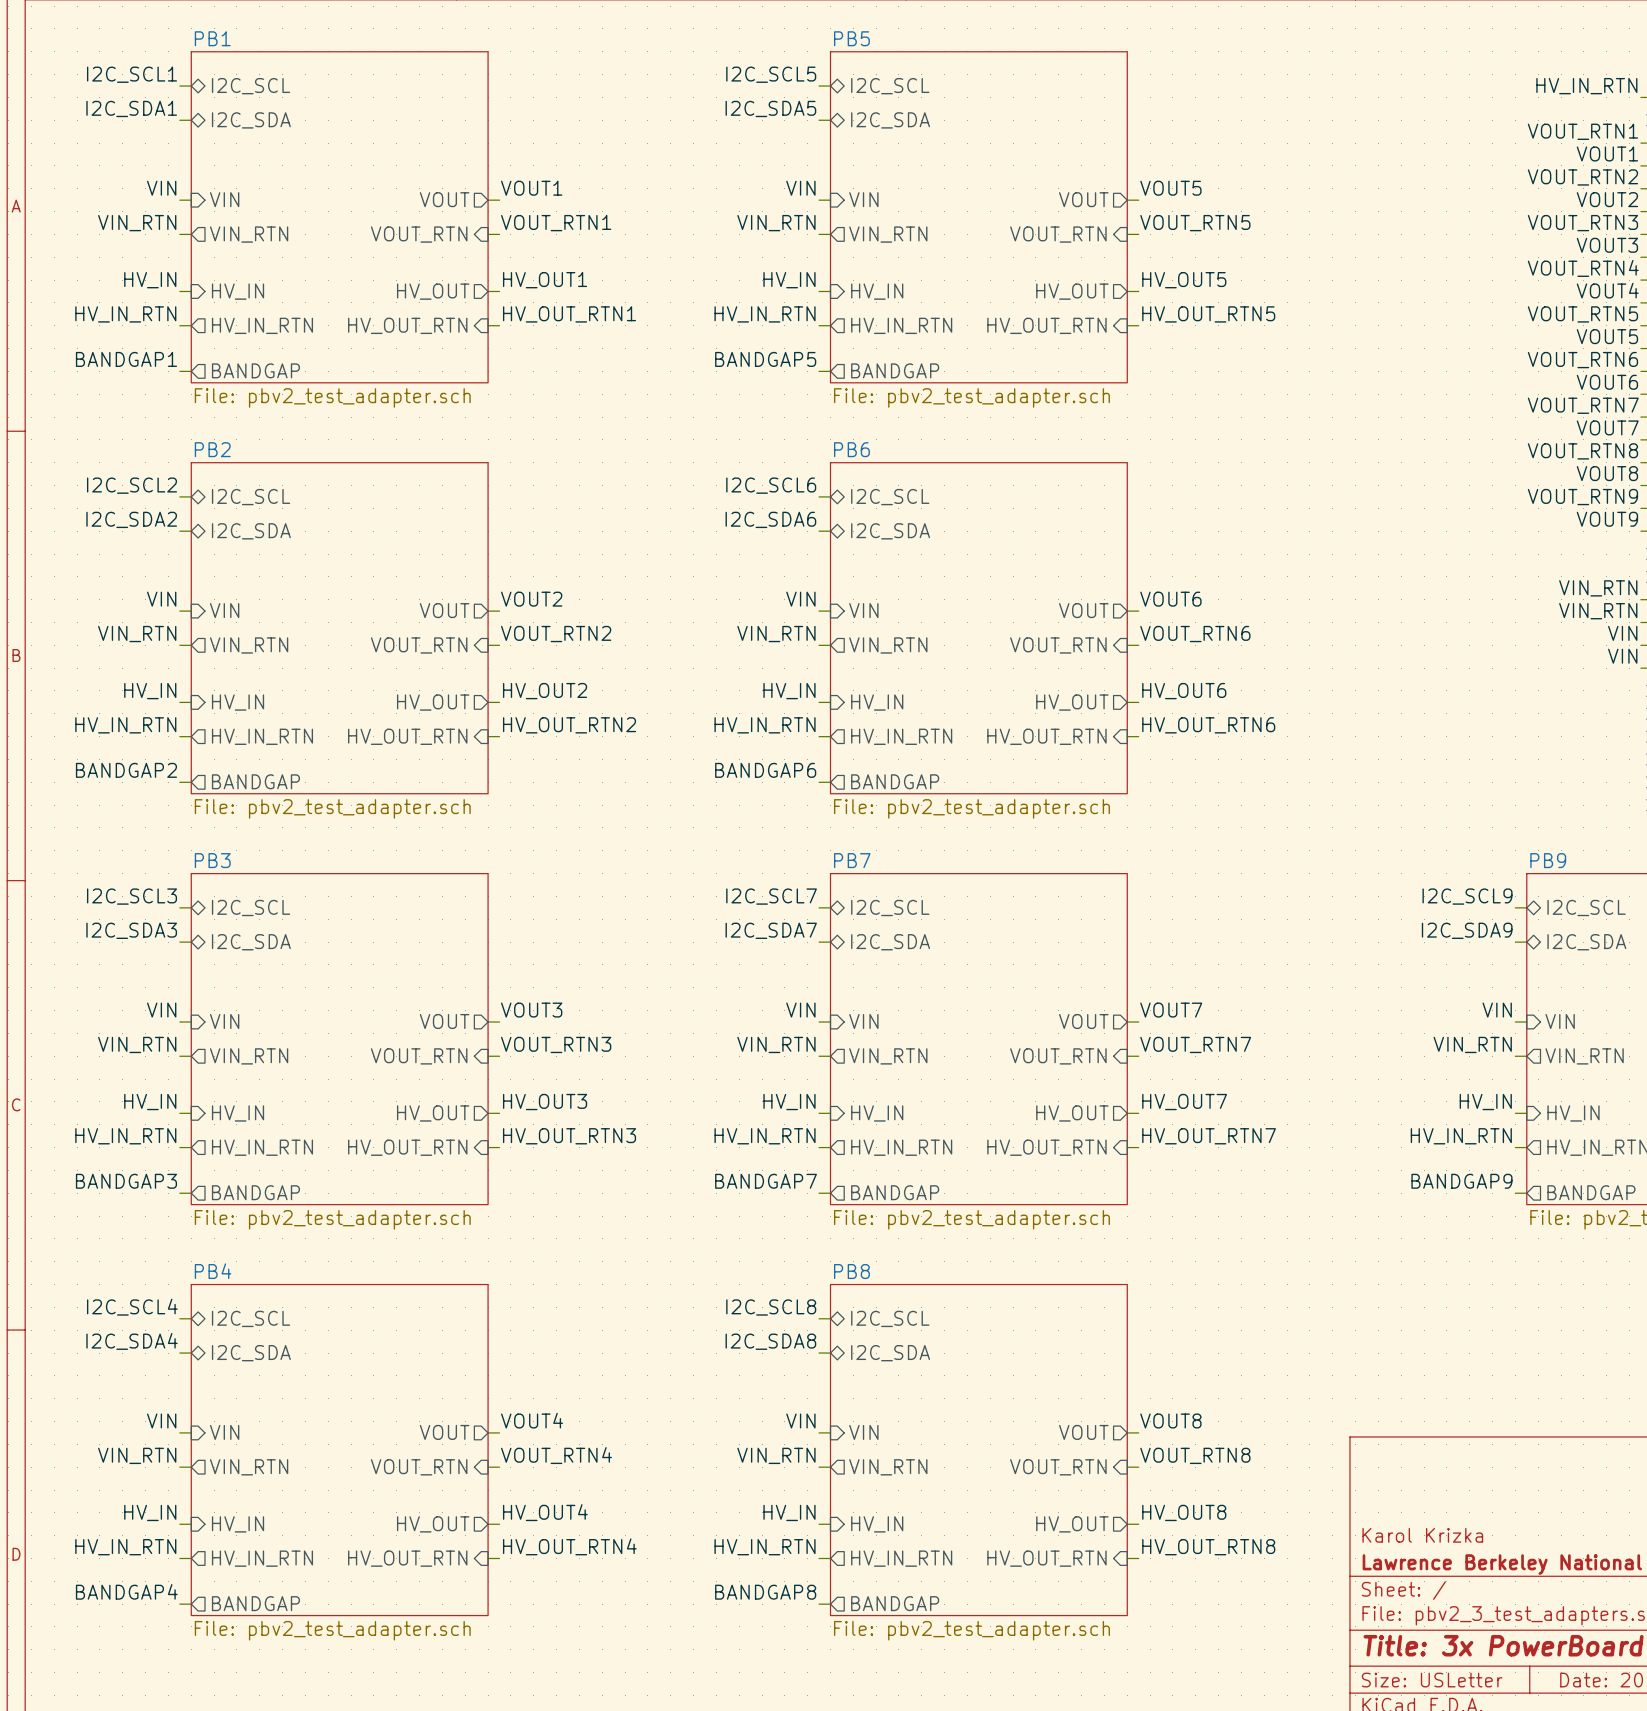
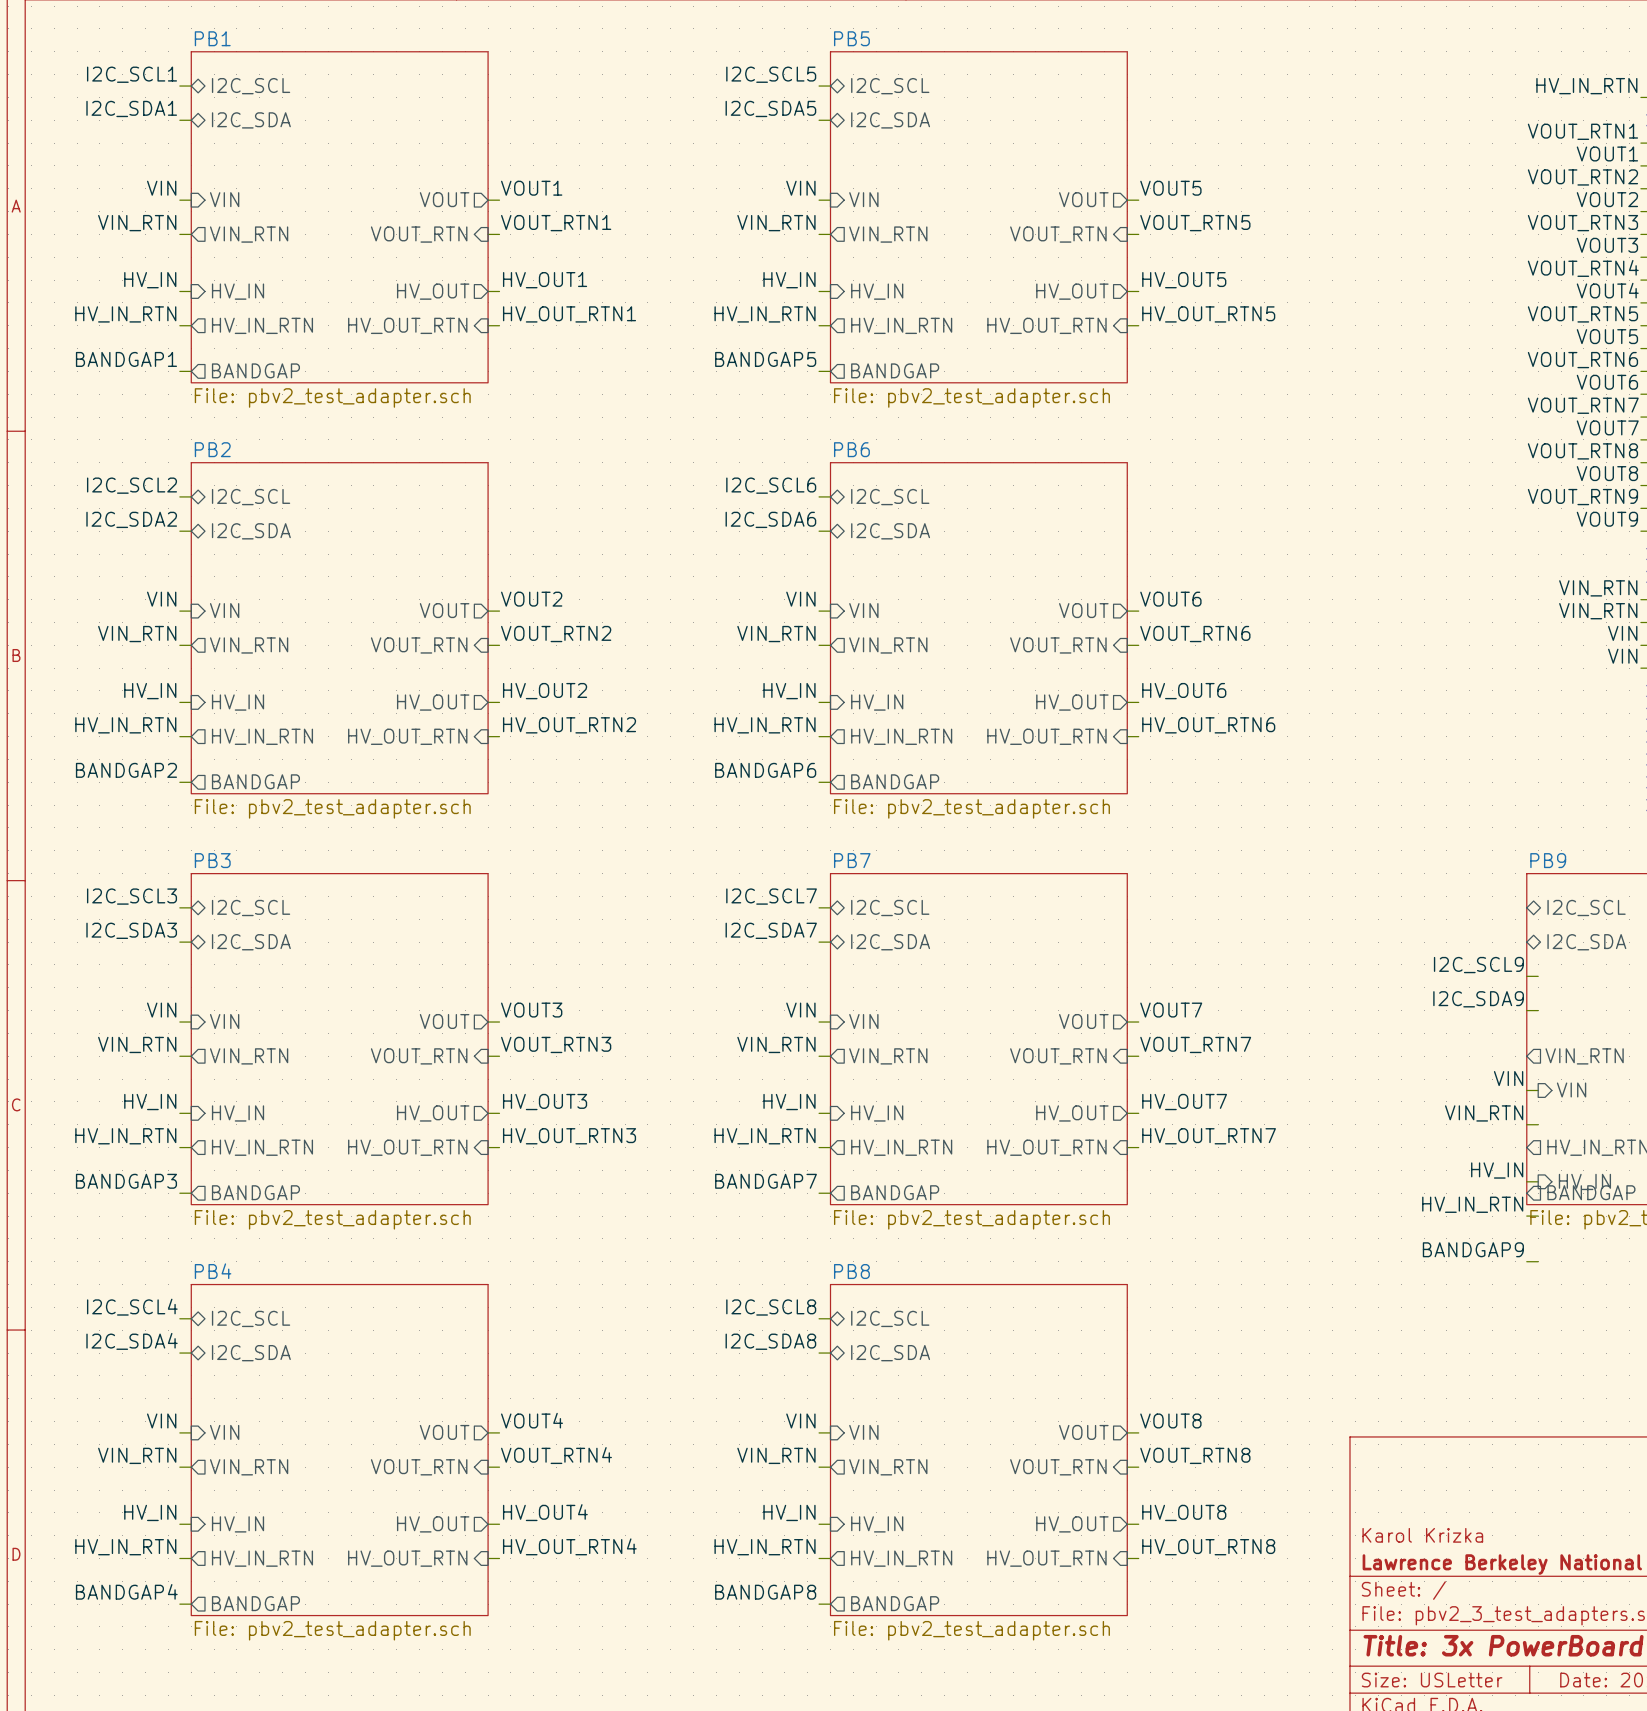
label position: I2C_SCL9 (1467, 896) -> I2C_SCL9 (1478, 965)
wire: (1515, 907) (1526, 907) -> (1526, 976) (1538, 976)
label position: I2C_SDA9 (1467, 930) -> I2C_SDA9 (1478, 999)
wire: (1515, 942) (1526, 942) -> (1526, 1010) (1538, 1010)
label position: VIN (1497, 1010) -> VIN (1508, 1078)
sheet pin position: VIN (1560, 1021) -> VIN (1571, 1089)
wire: (1515, 1022) (1526, 1022) -> (1526, 1090) (1538, 1090)
label position: VIN_RTN (1472, 1044) -> VIN_RTN (1484, 1113)
wire: (1515, 1056) (1526, 1056) -> (1526, 1124) (1538, 1124)
label position: HV_IN (1485, 1102) -> HV_IN (1497, 1170)
wire: (1515, 1113) (1526, 1113) -> (1526, 1181) (1538, 1181)
sheet pin position: HV_IN (1573, 1113) -> HV_IN (1584, 1181)
label position: HV_IN_RTN (1461, 1136) -> HV_IN_RTN (1472, 1204)
wire: (1515, 1147) (1526, 1147) -> (1526, 1216) (1538, 1216)
label position: BANDGAP9 (1461, 1181) -> BANDGAP9 (1473, 1249)
wire: (1515, 1193) (1526, 1193) -> (1526, 1261) (1538, 1261)

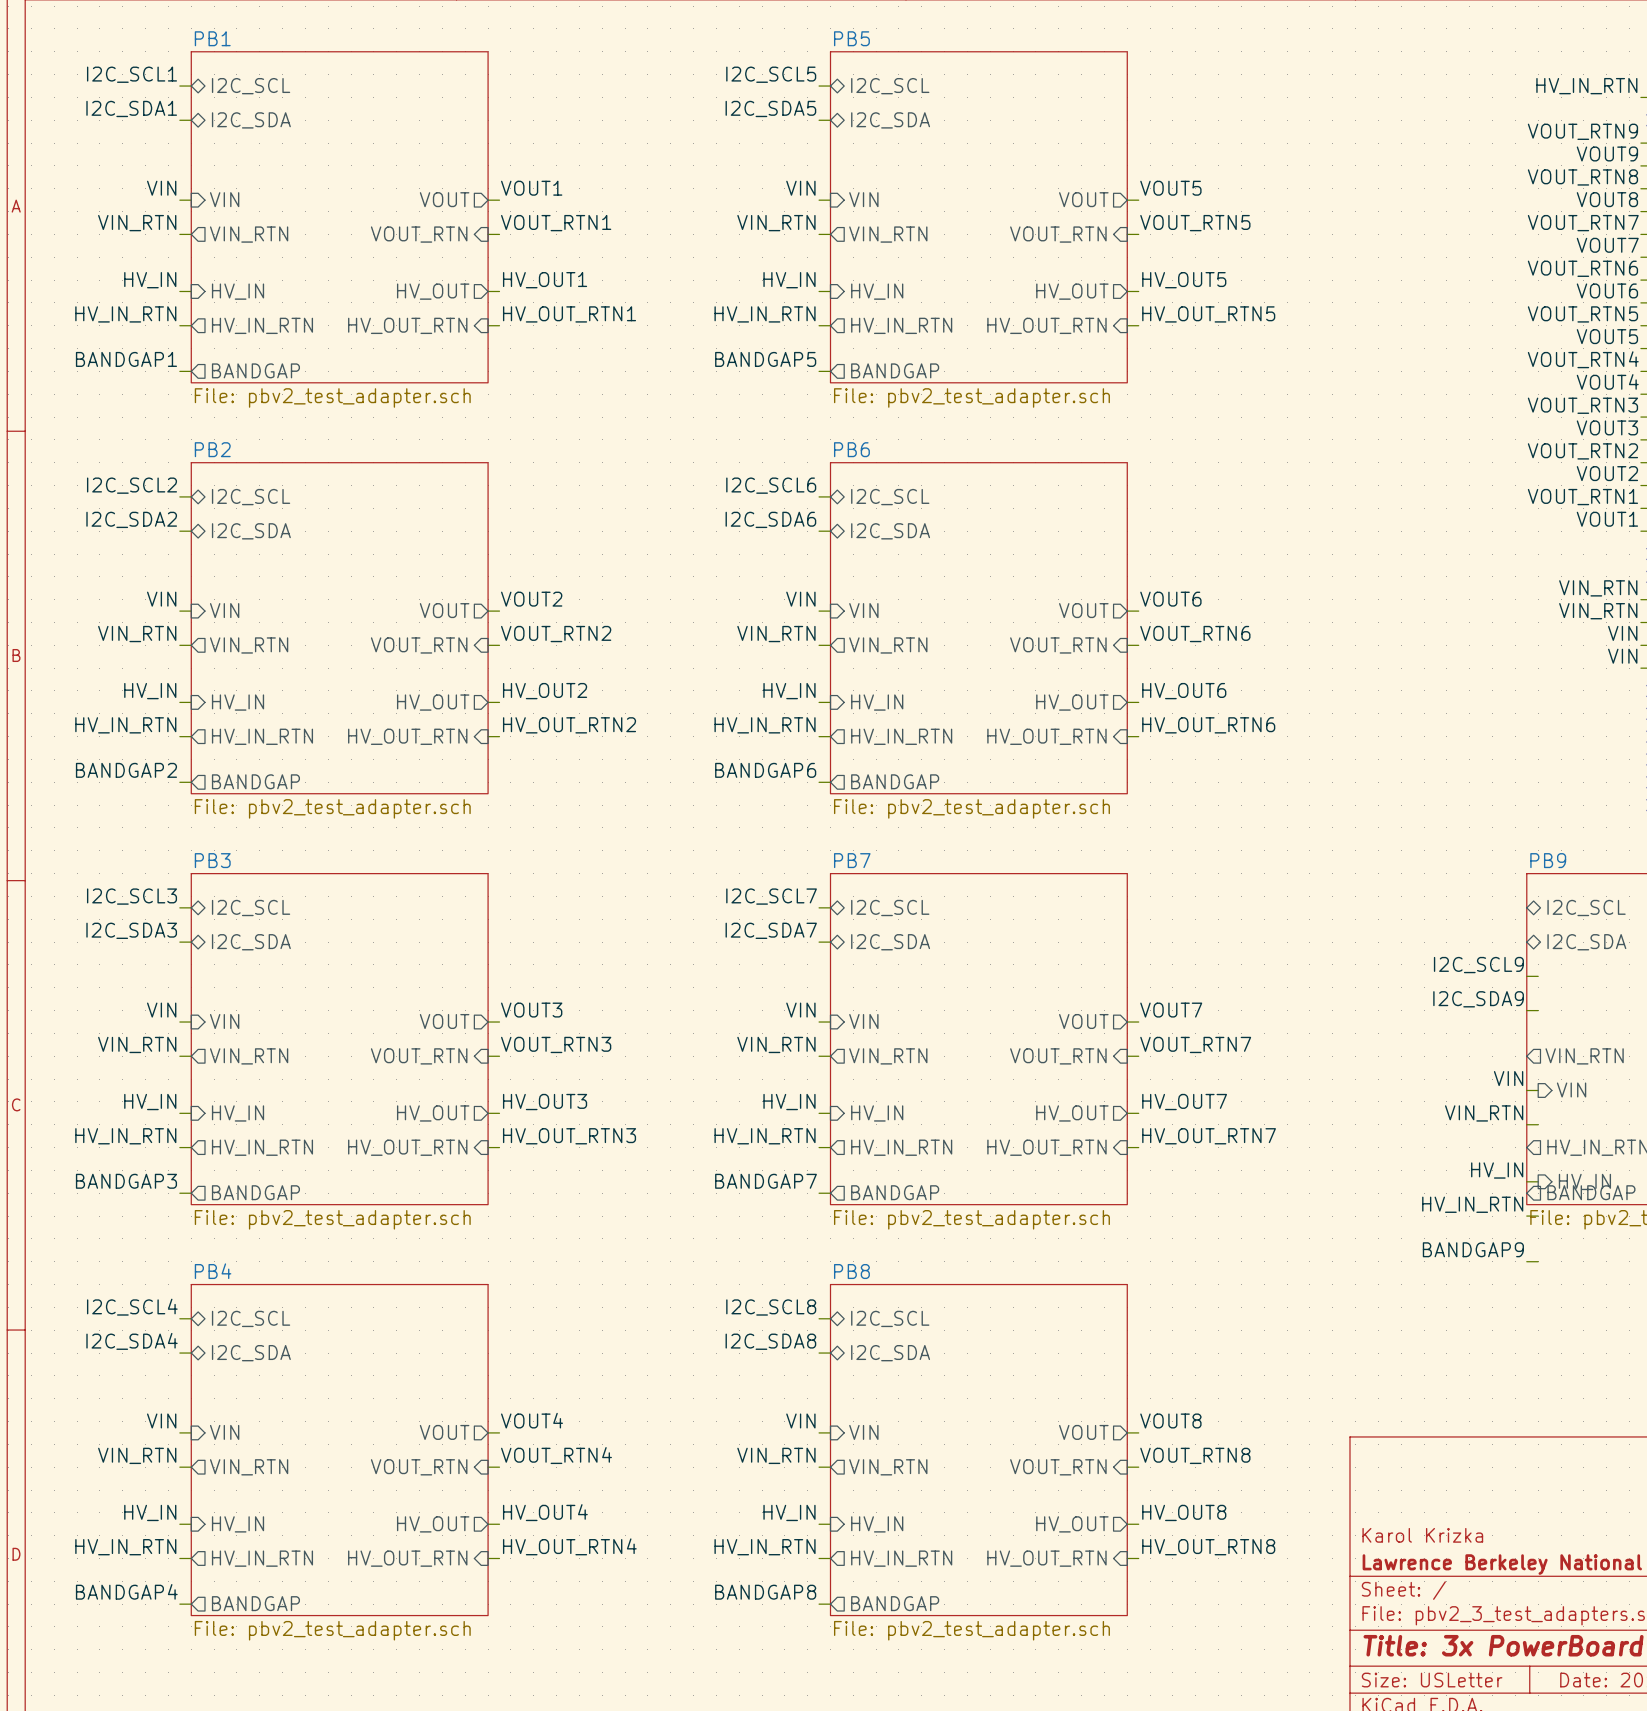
label: VOUT_RTN1 (1582, 131) -> VOUT_RTN9 (1582, 131)
label: VOUT1 (1607, 153) -> VOUT9 (1607, 153)
label: VOUT_RTN2 (1582, 177) -> VOUT_RTN8 (1582, 177)
label: VOUT2 (1607, 199) -> VOUT8 (1607, 199)
label: VOUT_RTN3 (1582, 223) -> VOUT_RTN7 (1583, 223)
label: VOUT3 (1607, 245) -> VOUT7 (1607, 245)
label: VOUT_RTN4 (1583, 268) -> VOUT_RTN6 (1582, 268)
label: VOUT4 (1607, 290) -> VOUT6 (1607, 290)
label: VOUT_RTN6 (1582, 360) -> VOUT_RTN4 (1583, 359)
label: VOUT6 (1607, 382) -> VOUT4 (1607, 381)
label: VOUT_RTN7 (1583, 405) -> VOUT_RTN3 (1582, 405)
label: VOUT7 (1607, 427) -> VOUT3 (1607, 427)
label: VOUT_RTN8 (1582, 451) -> VOUT_RTN2 (1582, 451)
label: VOUT8 (1607, 473) -> VOUT2 (1607, 473)
label: VOUT_RTN9 (1582, 497) -> VOUT_RTN1 (1582, 497)
label: VOUT9 (1607, 519) -> VOUT1 (1607, 519)

